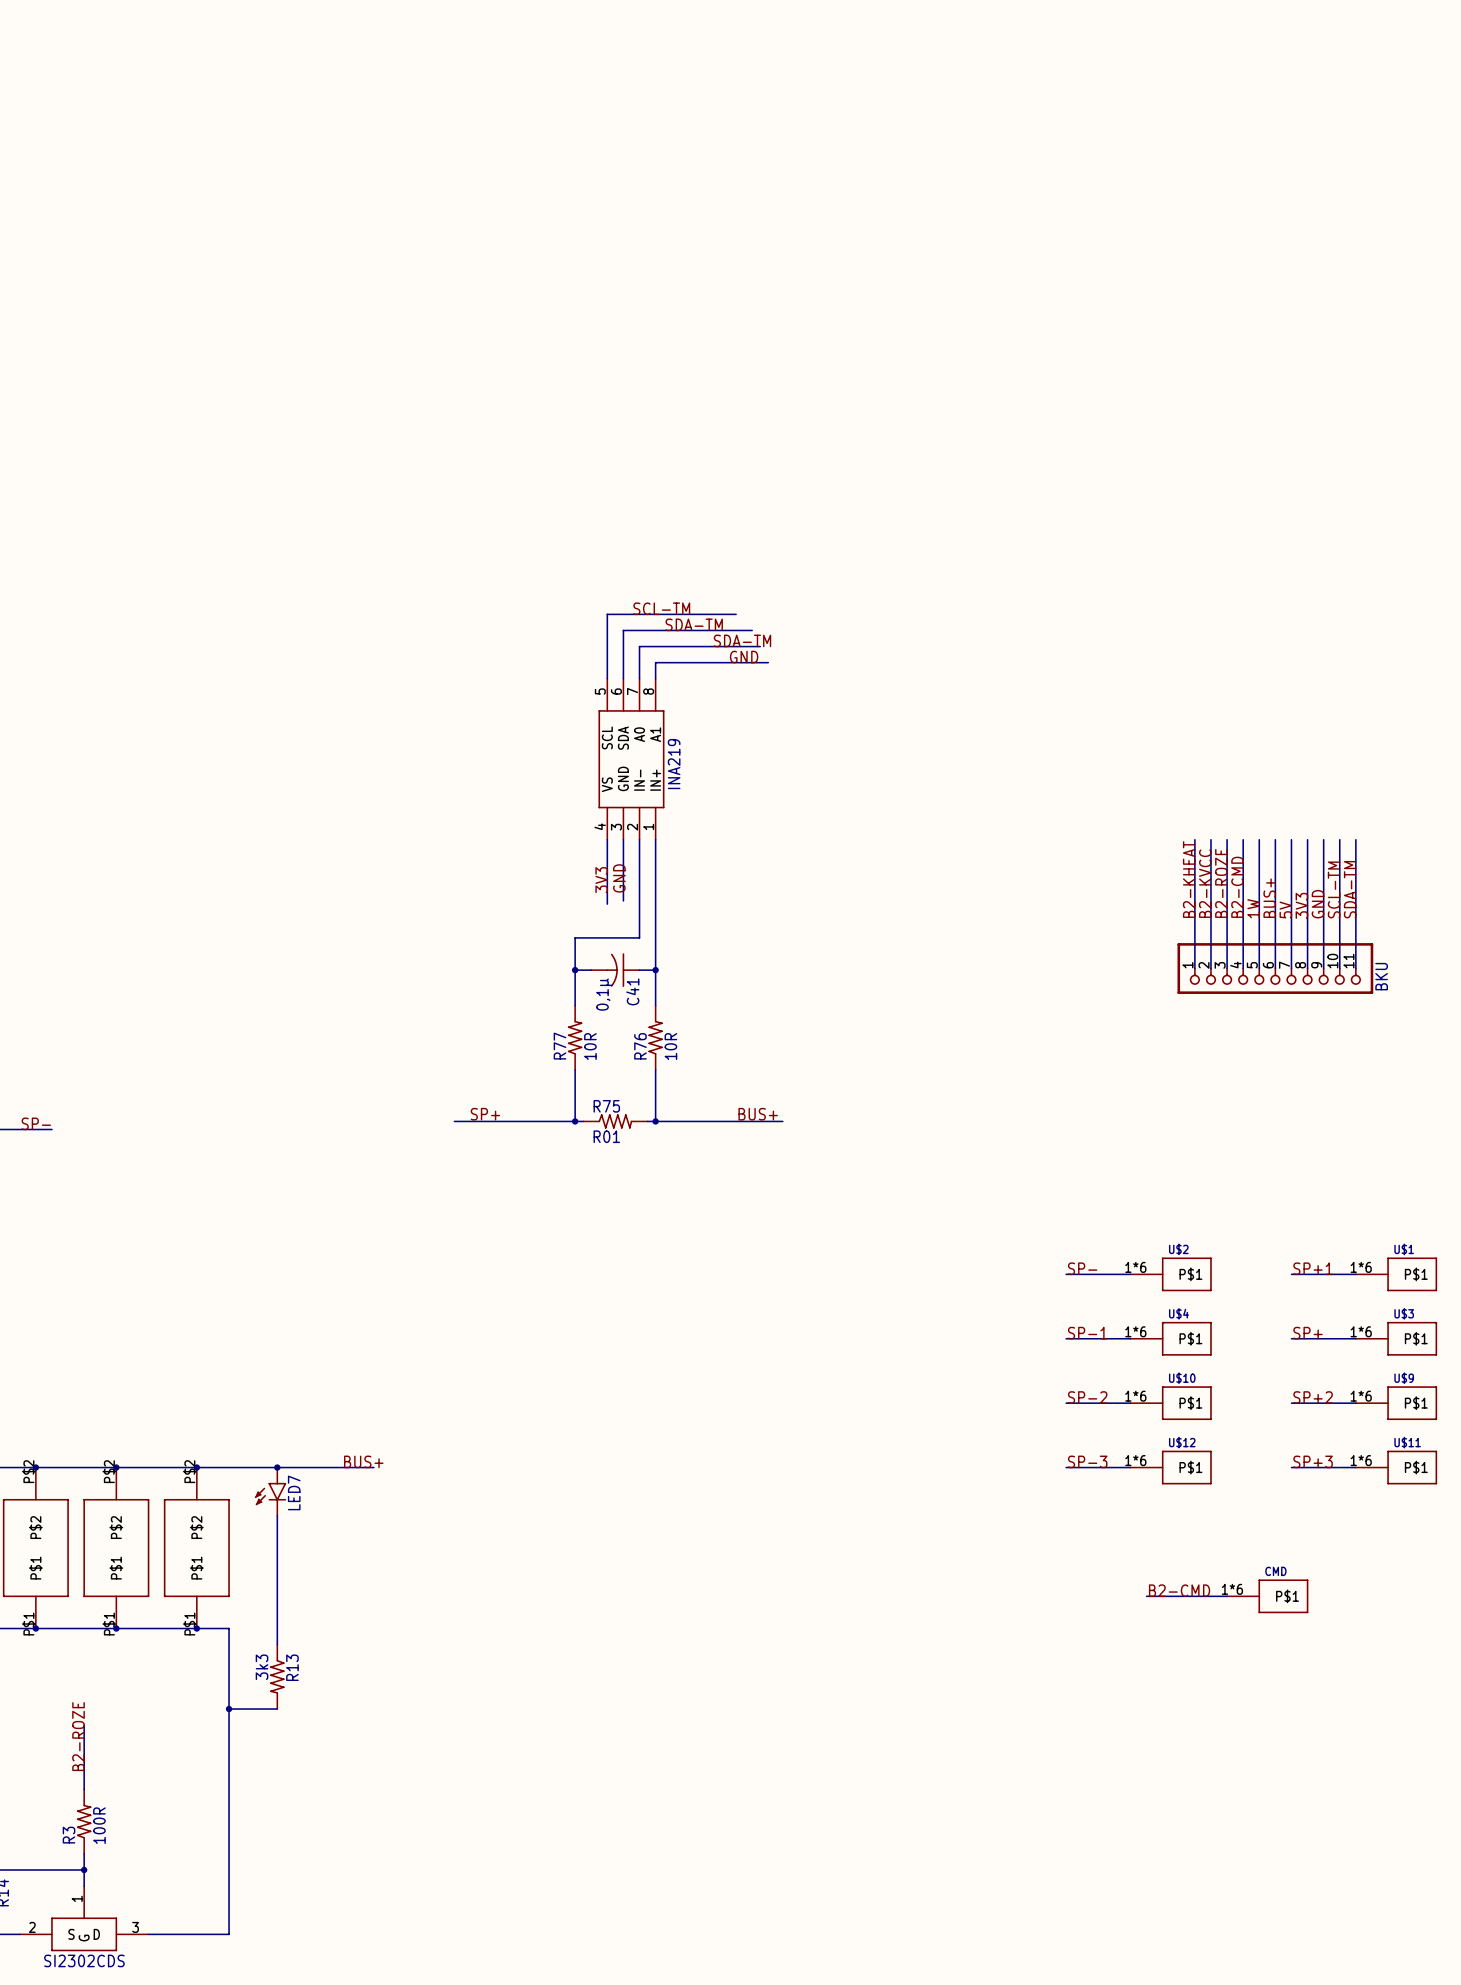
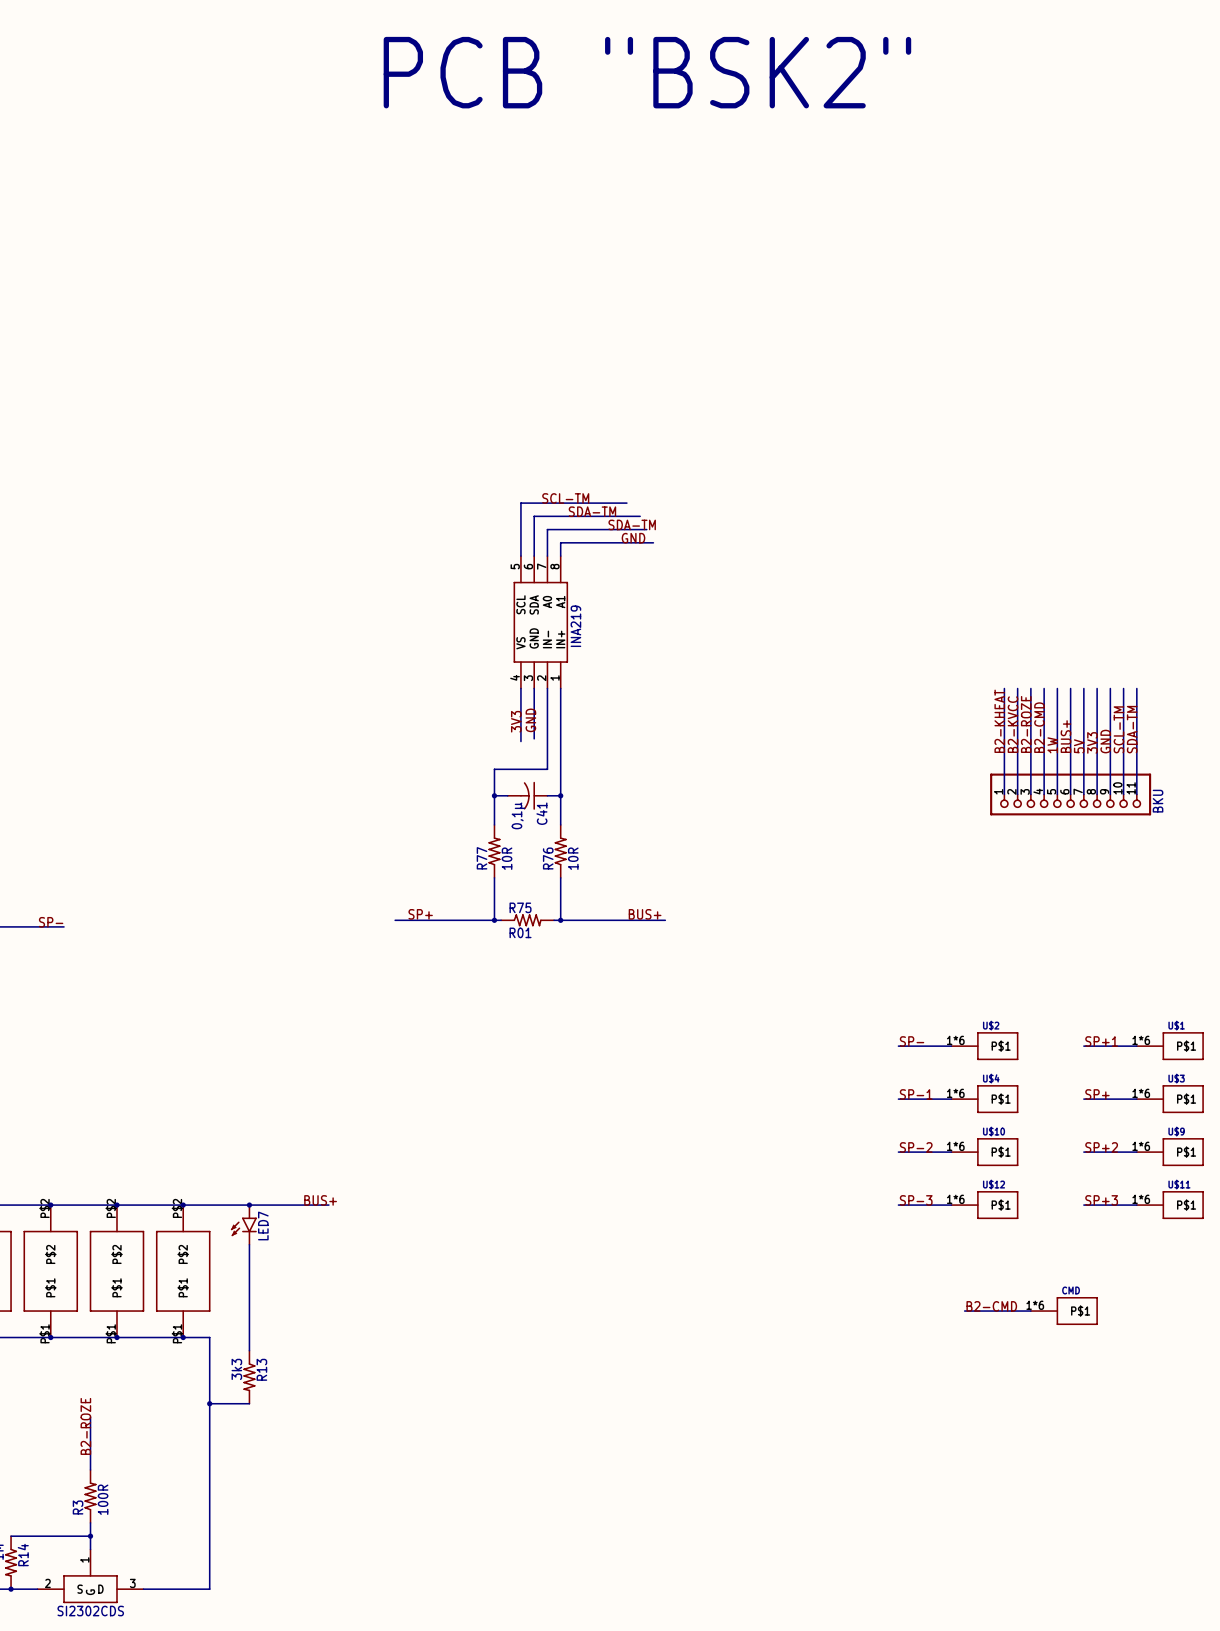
part: none -> PCB "BSK2" (647, 72)

